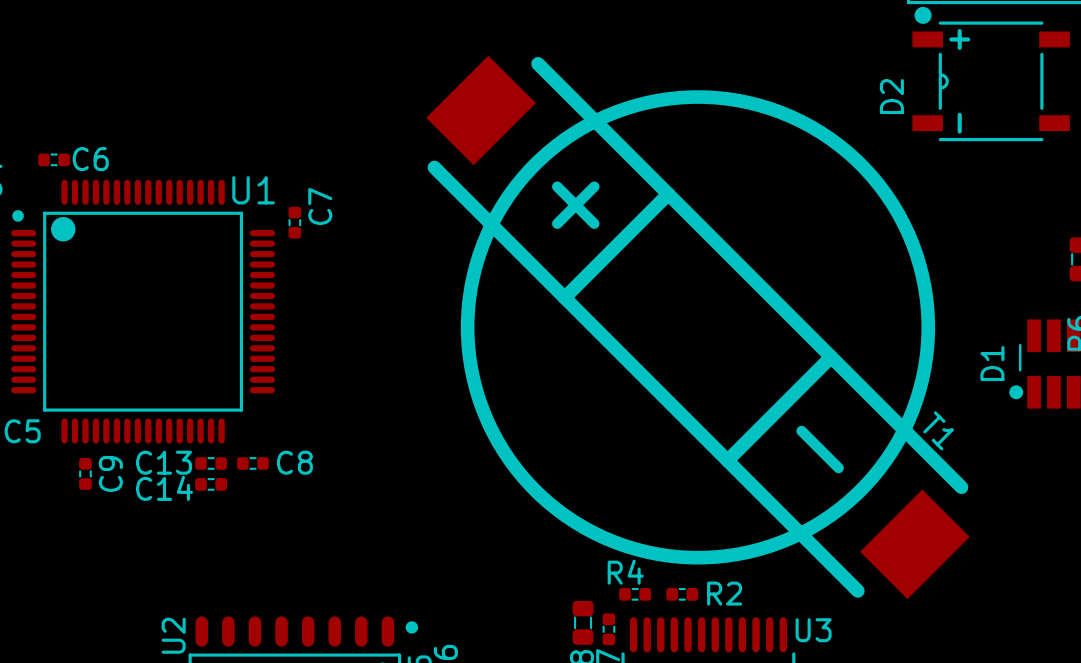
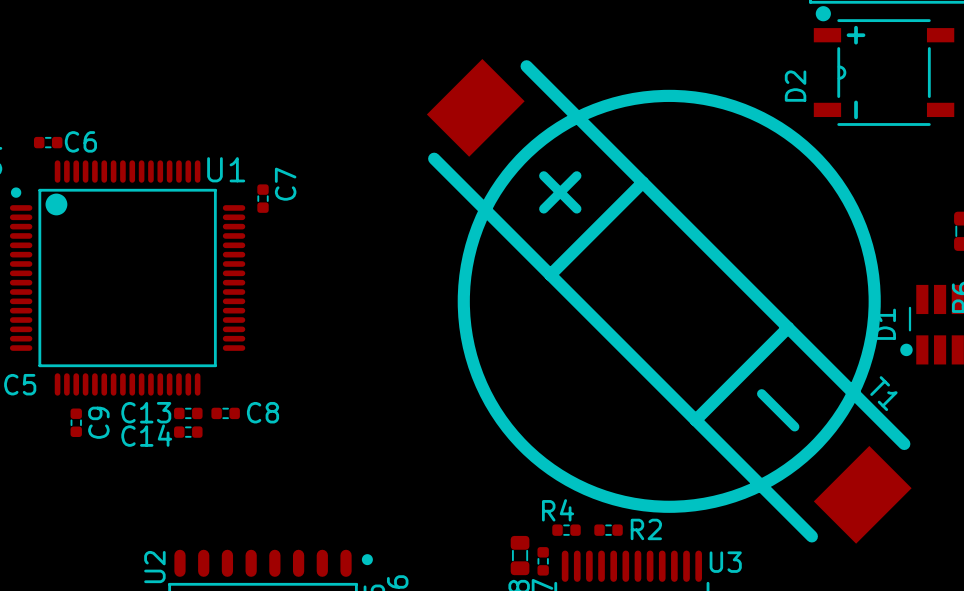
T1 position: (697, 327) -> (669, 301)

